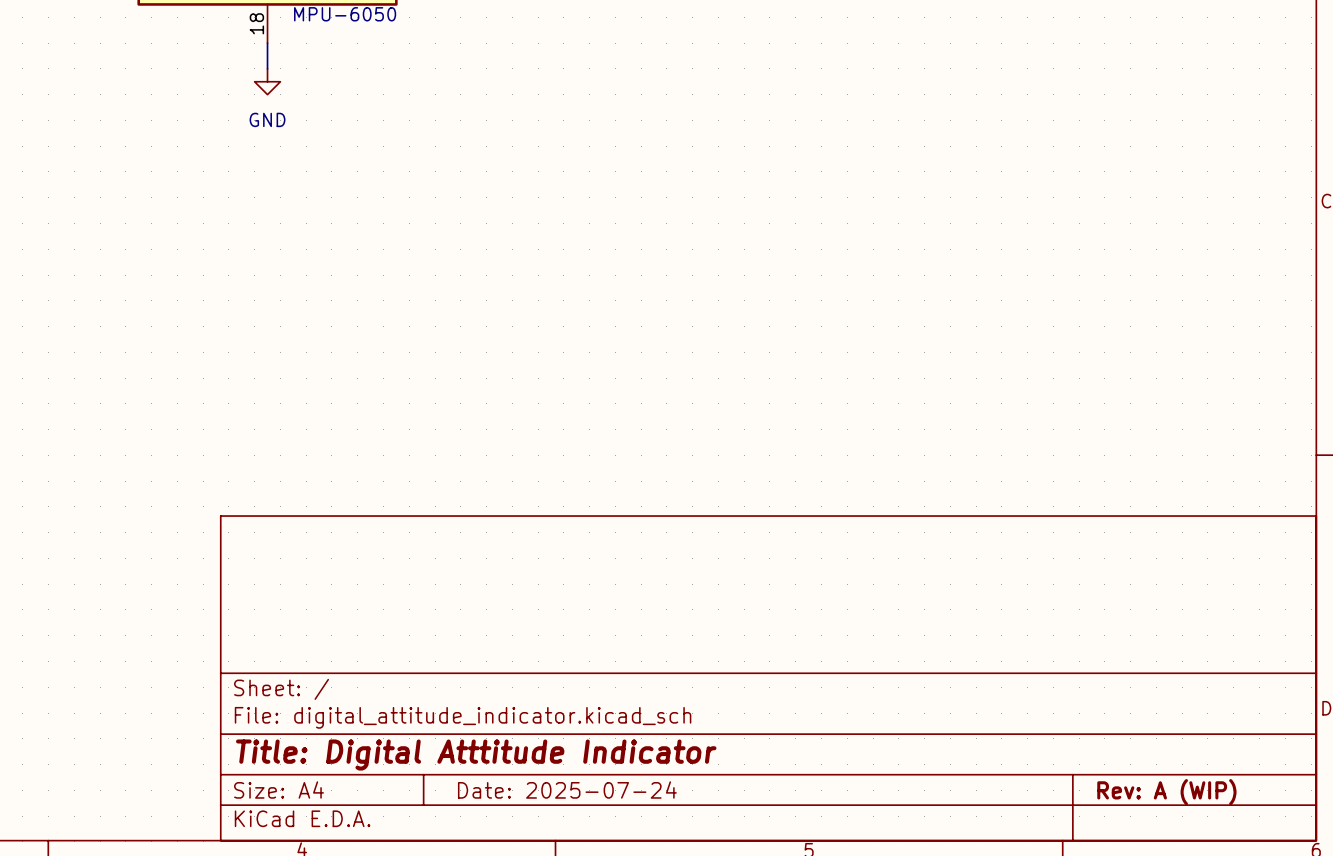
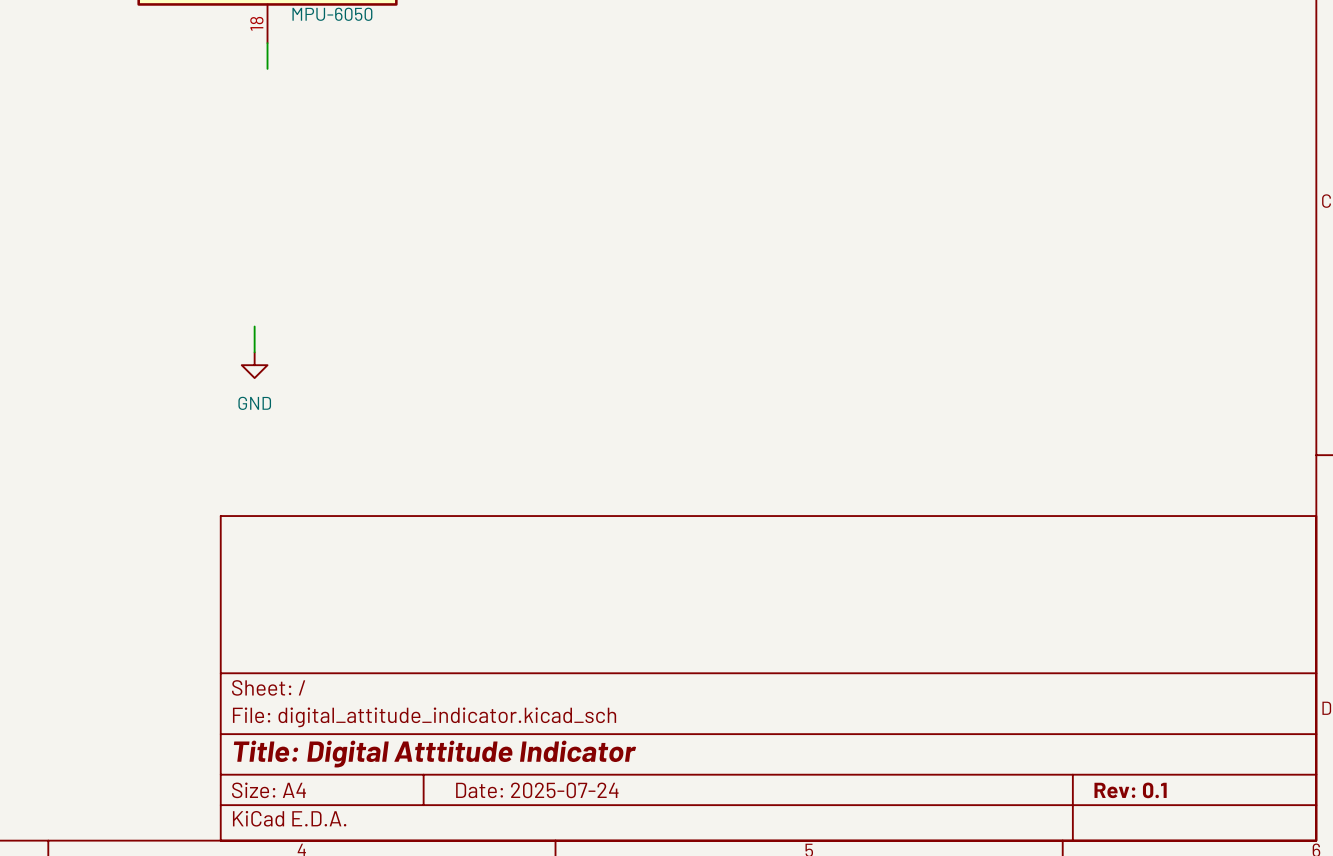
power symbol: GND (267, 81) -> none
wire: none -> (254, 326) (254, 352)
power symbol: none -> GND (254, 365)
title block: Rev: A (WIP) (1166, 792) -> Rev: 0.1 (1130, 790)

